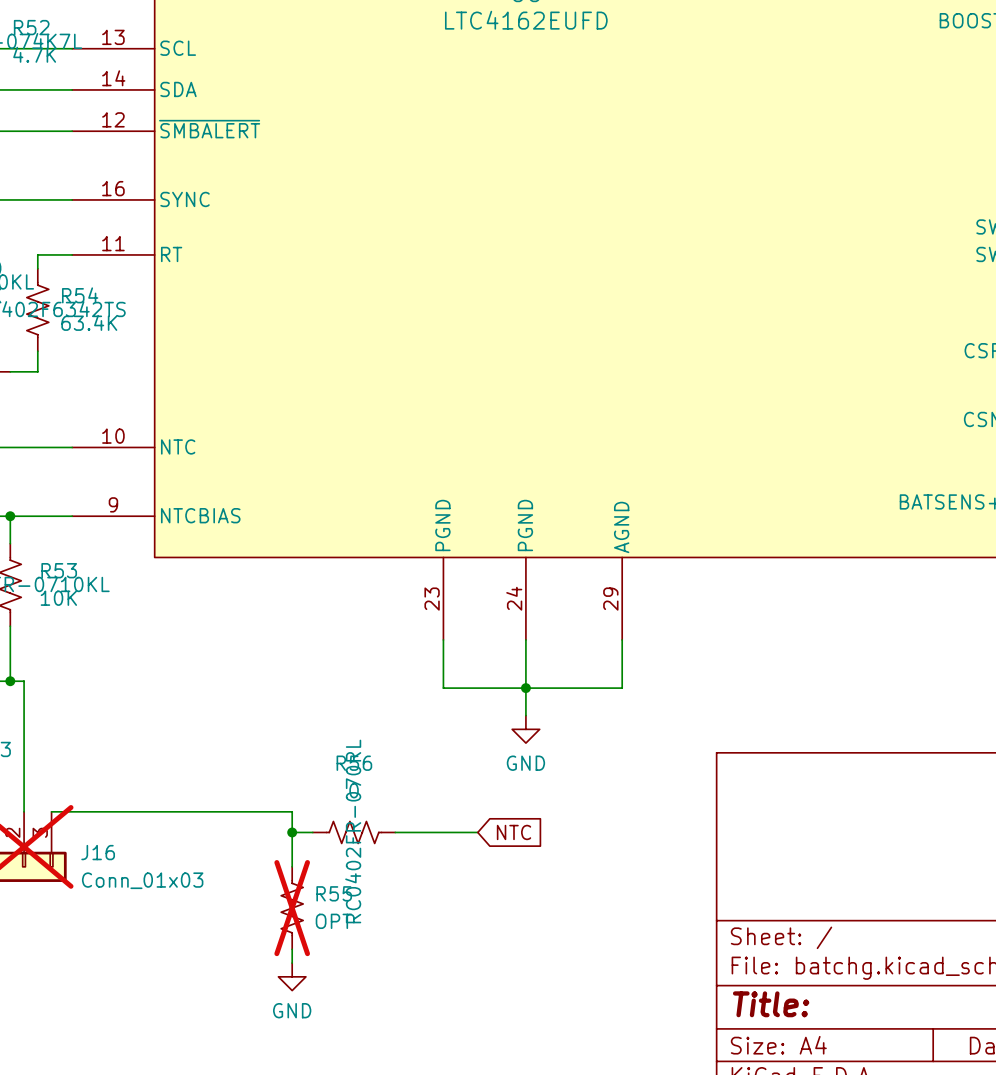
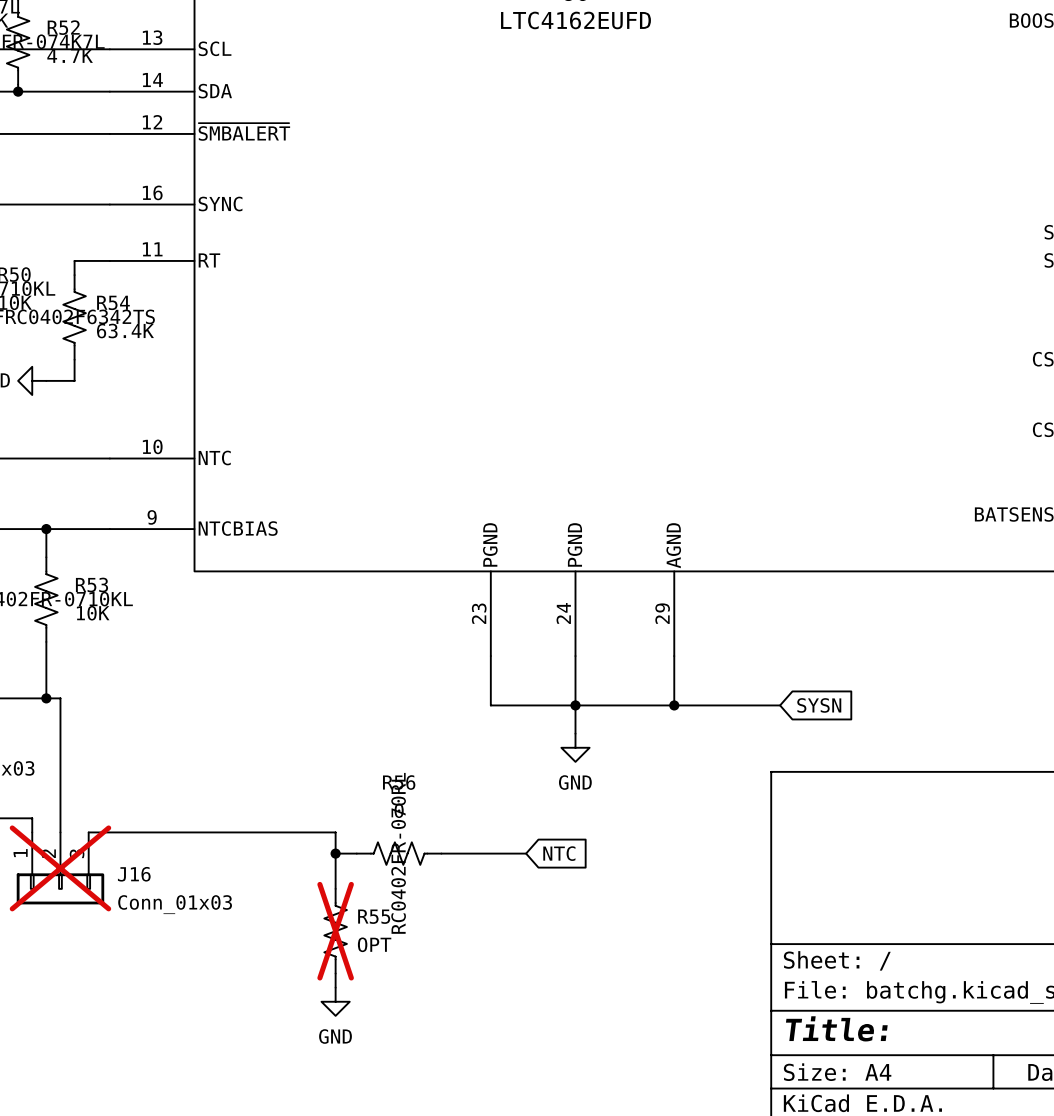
wire: none -> (674, 705) (780, 705)
junction: none -> (674, 705)
global label: none -> SYSN (819, 705)

